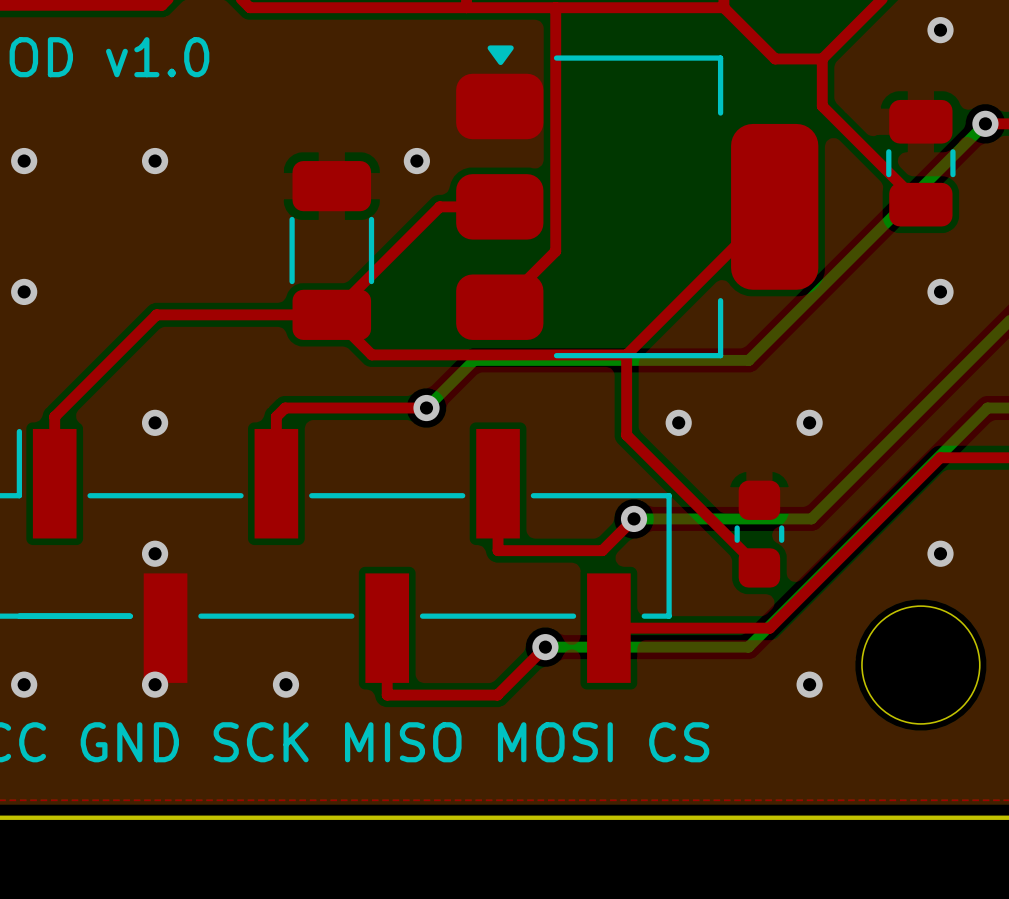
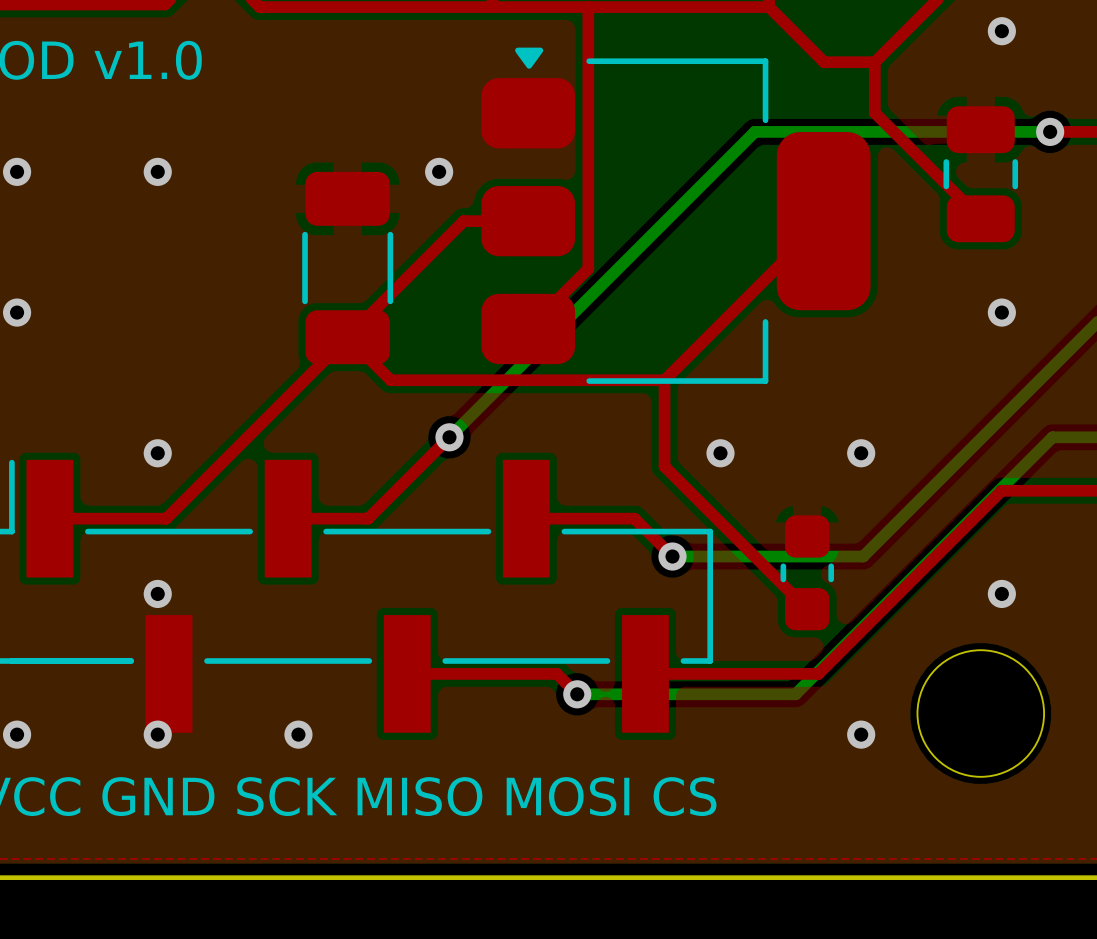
bottom track: (985, 123) (748, 360) (474, 360) -> (1050, 131) (754, 131) (500, 386)
top track: (331, 314) (156, 314) (54, 416) (54, 483) -> (347, 337) (166, 518) (49, 518)
top track: (426, 408) (285, 408) (276, 416) (276, 483) -> (449, 437) (368, 518) (288, 518)
top track: (498, 483) (498, 550) (602, 550) (634, 518) -> (526, 518) (634, 518) (672, 556)
top track: (387, 628) (387, 695) (497, 695) (545, 647) -> (407, 673) (556, 673) (577, 694)

